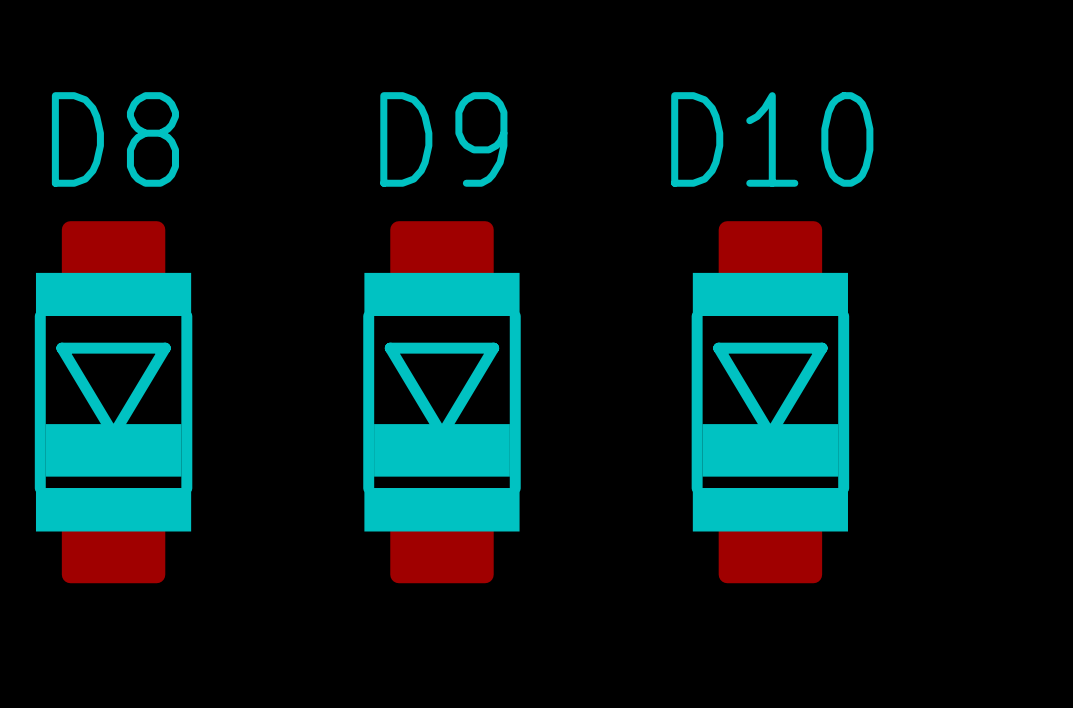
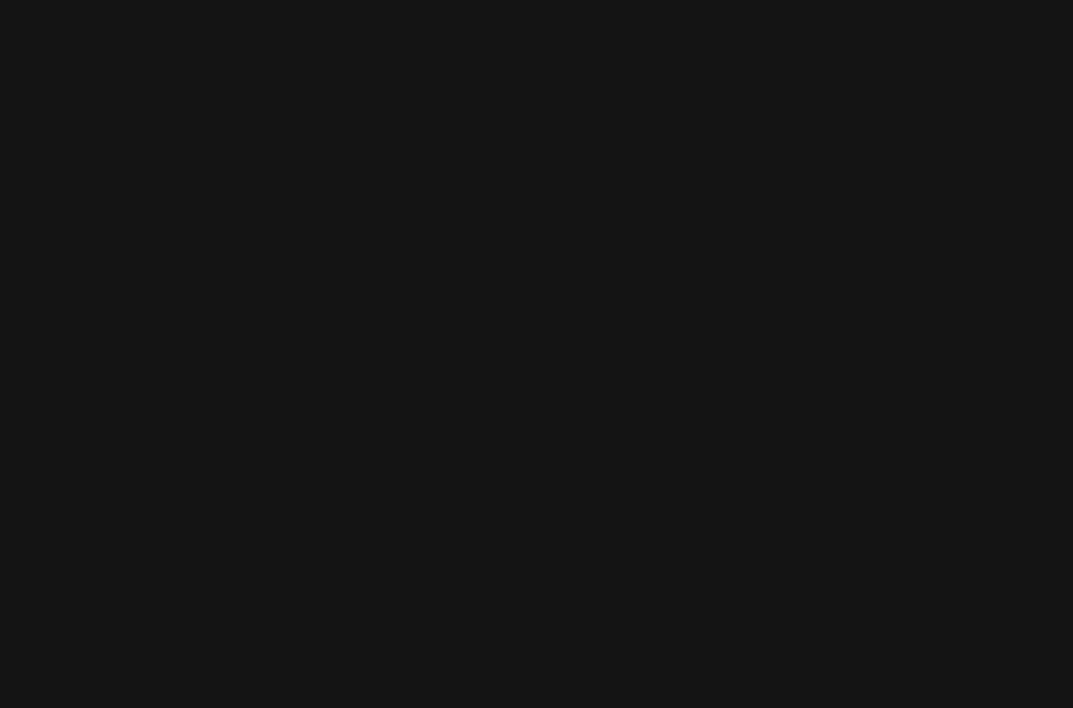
D8: (113, 402) -> none
D9: (441, 402) -> none
D10: (770, 402) -> none

